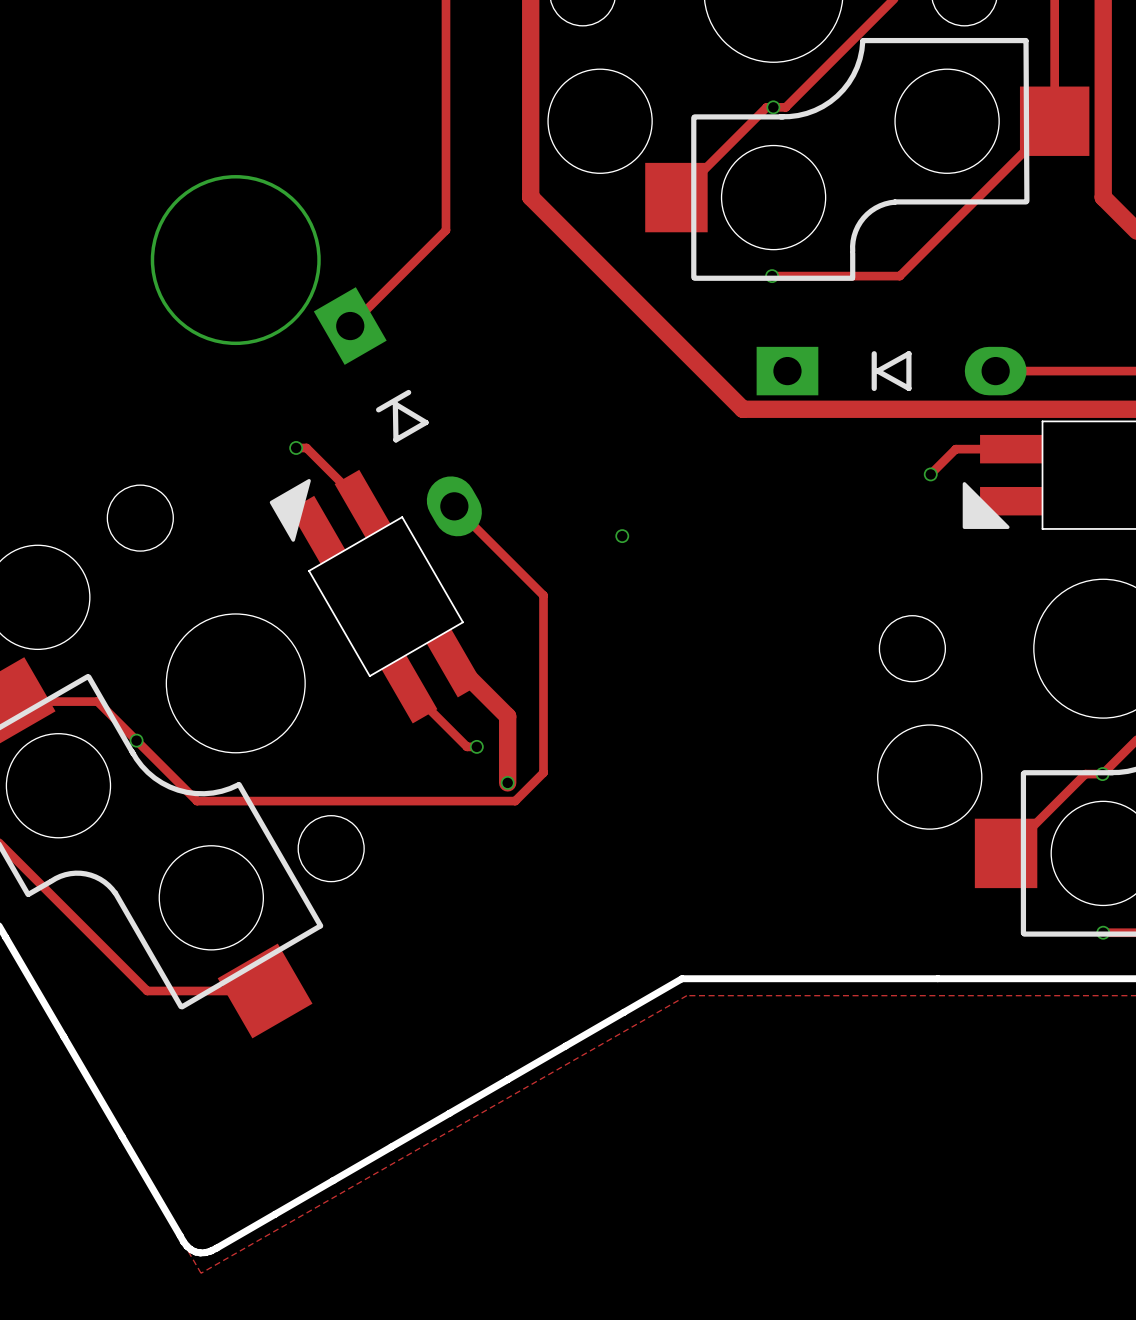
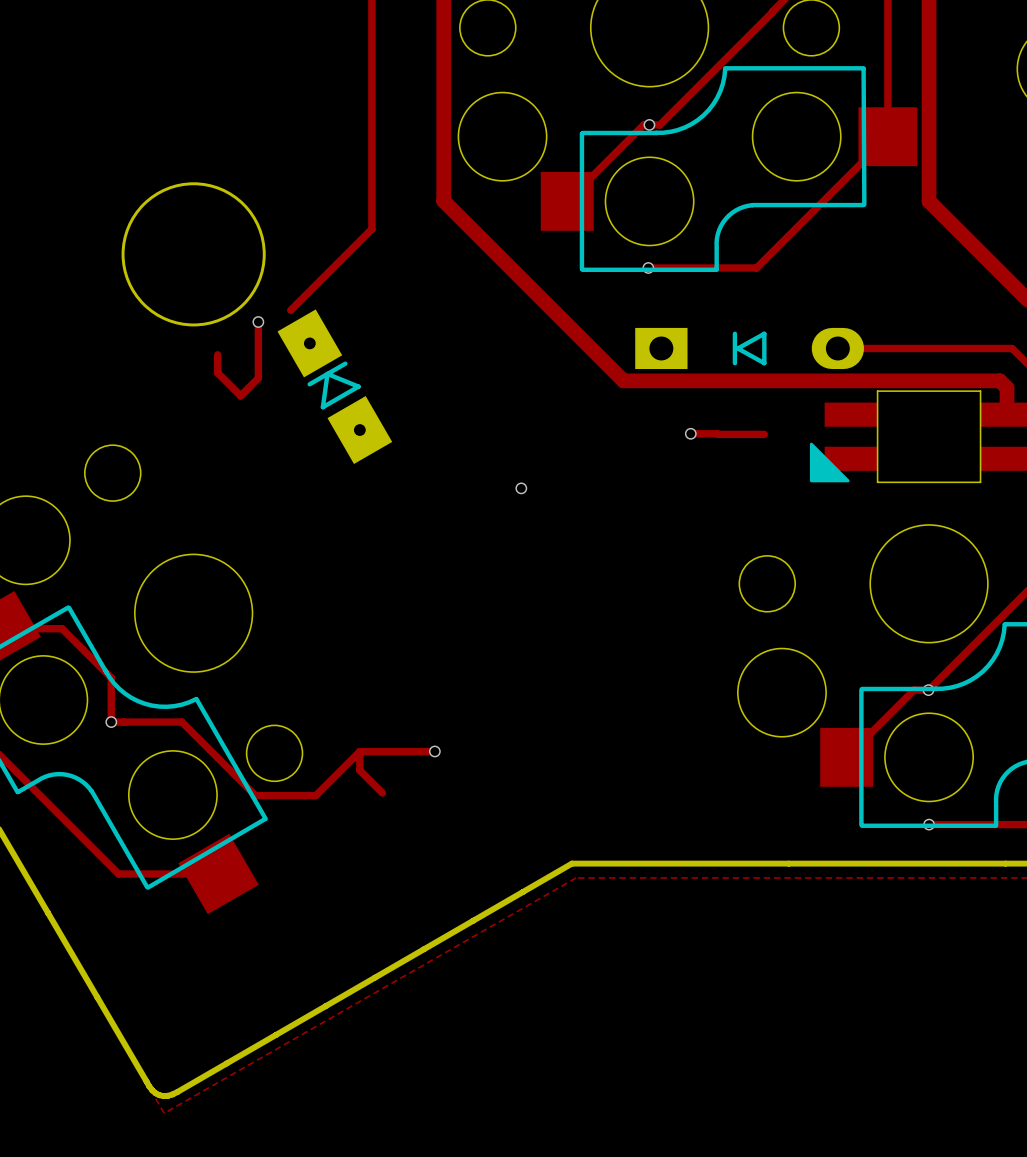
part footprint: [313, 287, 482, 537] -> [277, 309, 393, 464]
track: none -> (258, 322) (258, 378) (240, 395) (217, 372) (217, 354)
track: (296, 447) (306, 447) (362, 503) -> none
via position: (296, 447) -> (258, 322)
track: (1011, 449) (955, 449) (929, 475) -> none
track: none -> (690, 433) (764, 434)
via position: (930, 474) -> (690, 433)
track: (454, 506) (543, 595) (543, 772) (515, 801) (197, 801) (97, 701) (80, 701) -> (359, 751) (315, 795) (255, 795) (181, 722) (111, 722) (111, 677) (62, 628)
part: (376, 596) -> none
track: (454, 663) (507, 716) (507, 782) -> none
track: (409, 689) (467, 746) (476, 746) -> none
via position: (136, 740) -> (111, 722)
via: (476, 746) -> none
via: (507, 782) -> none
track: none -> (359, 751) (359, 770) (382, 792)
track: none -> (359, 751) (434, 751)
via: none -> (434, 751)

